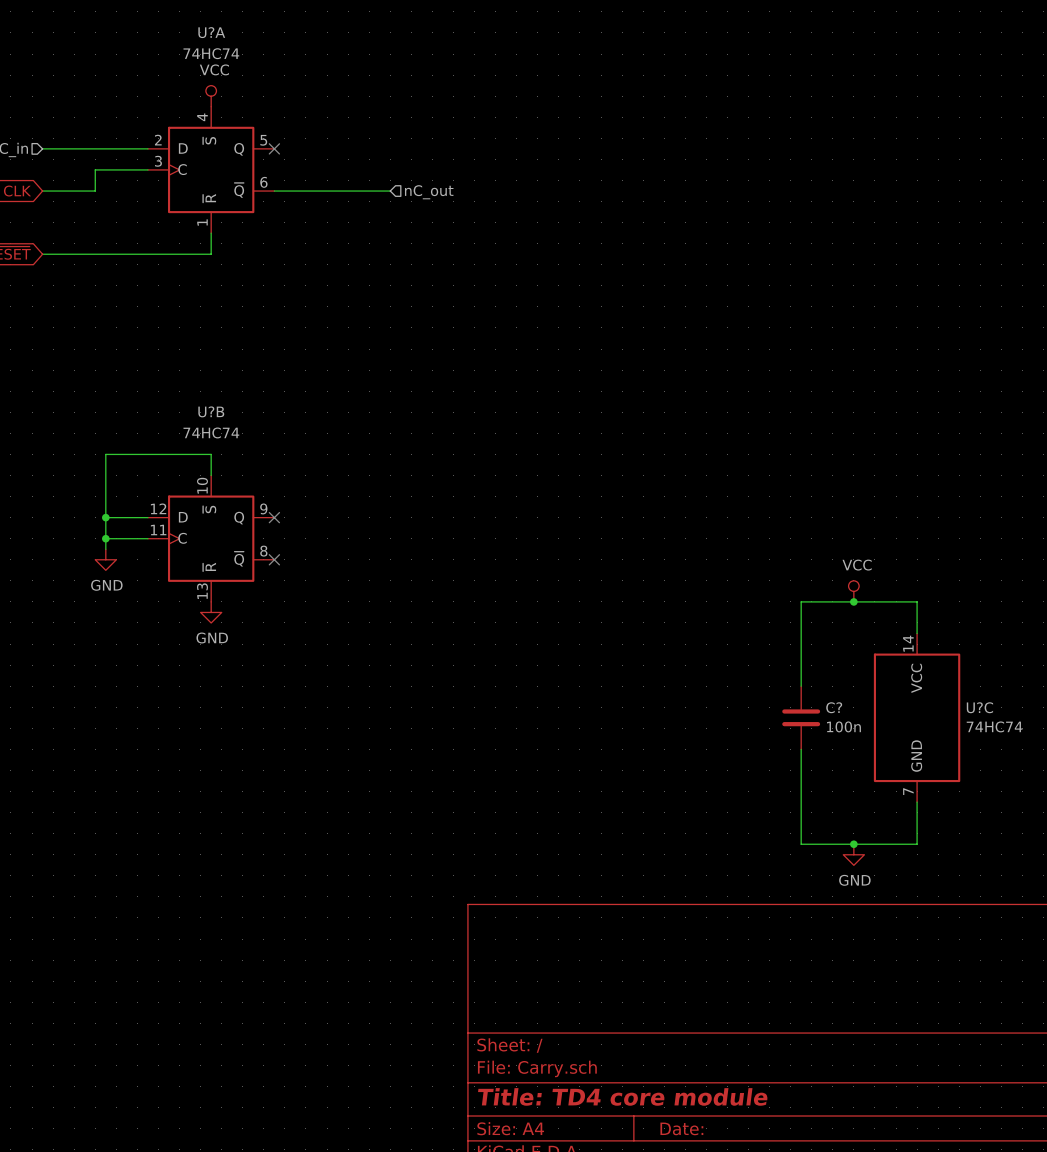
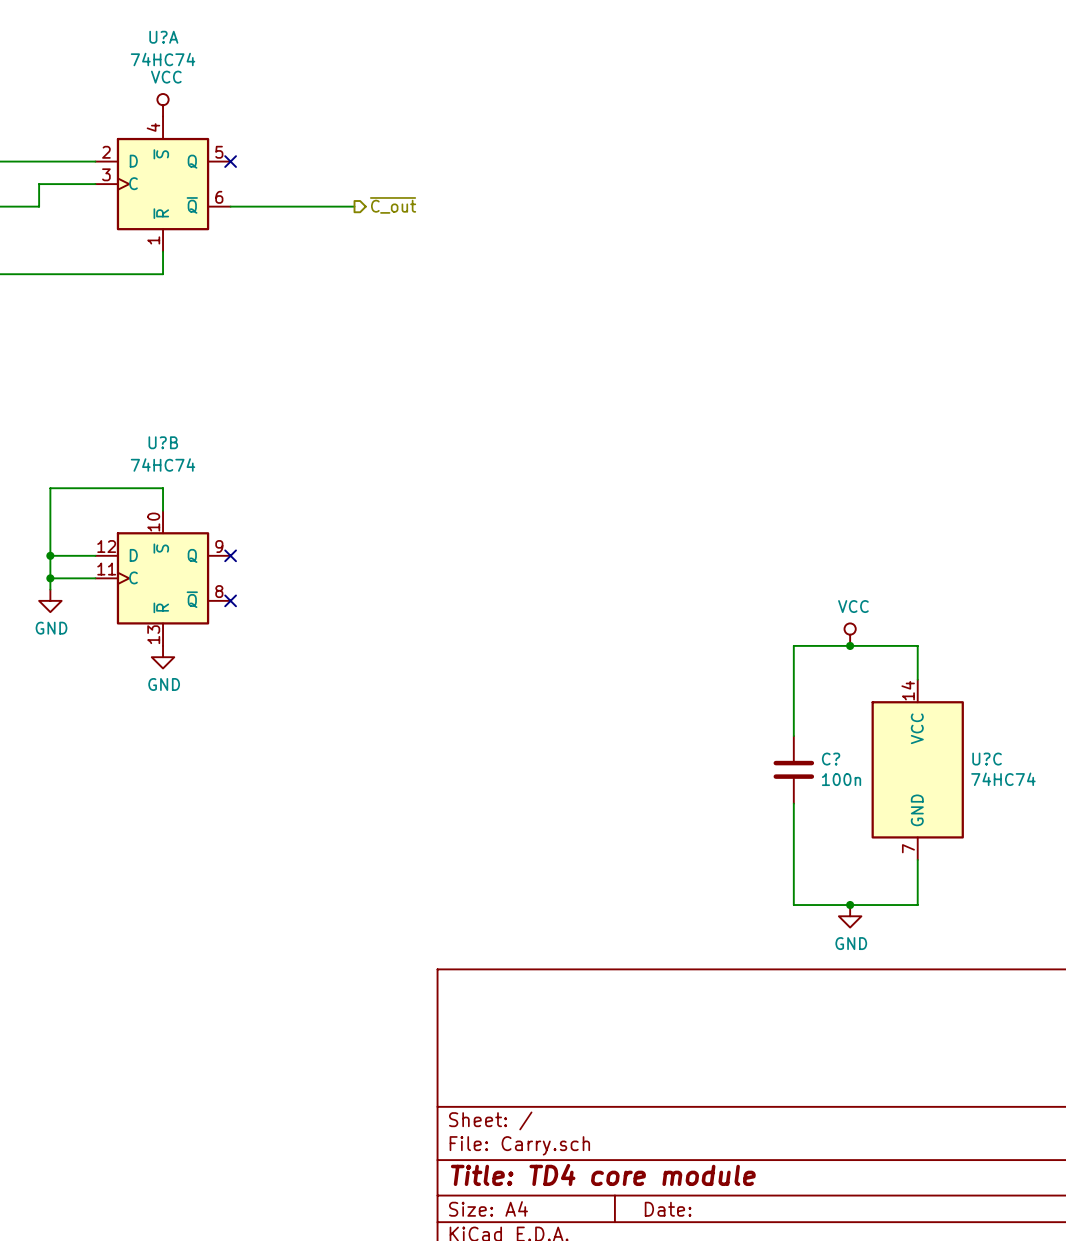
hierarchical label shape: input (429, 192) -> output (393, 205)
hierarchical label: nC_out (429, 192) -> ~{C_out} (393, 205)

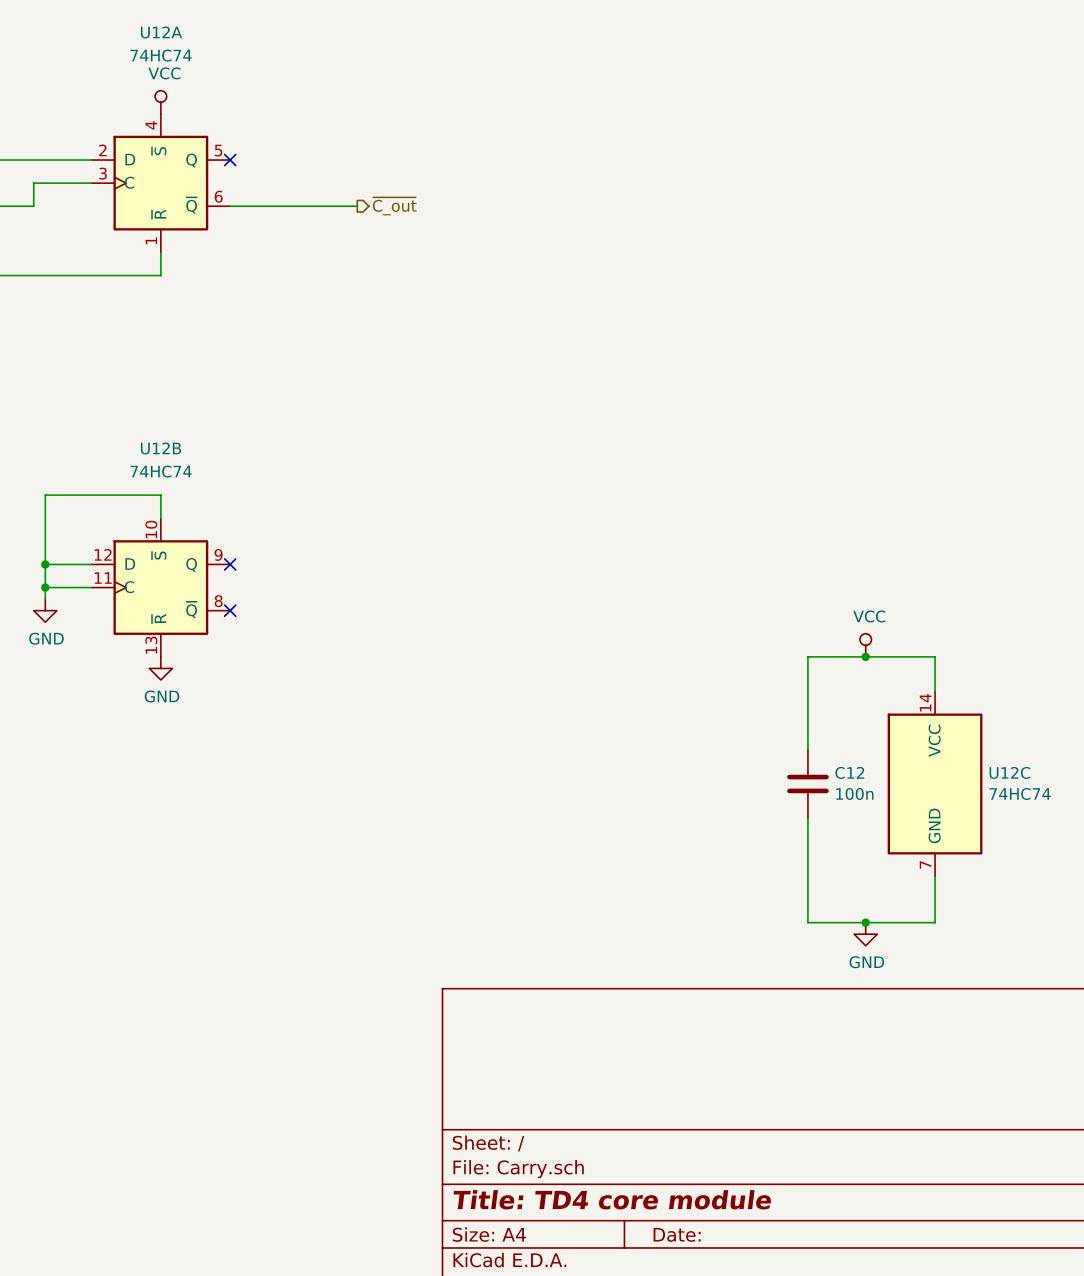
U?A name: U?A (163, 37) -> U12A (161, 32)
U?B name: U?B (163, 442) -> U12B (161, 448)
C? name: C? (831, 759) -> C12 (849, 772)
U?C name: U?C (987, 759) -> U12C (1009, 772)

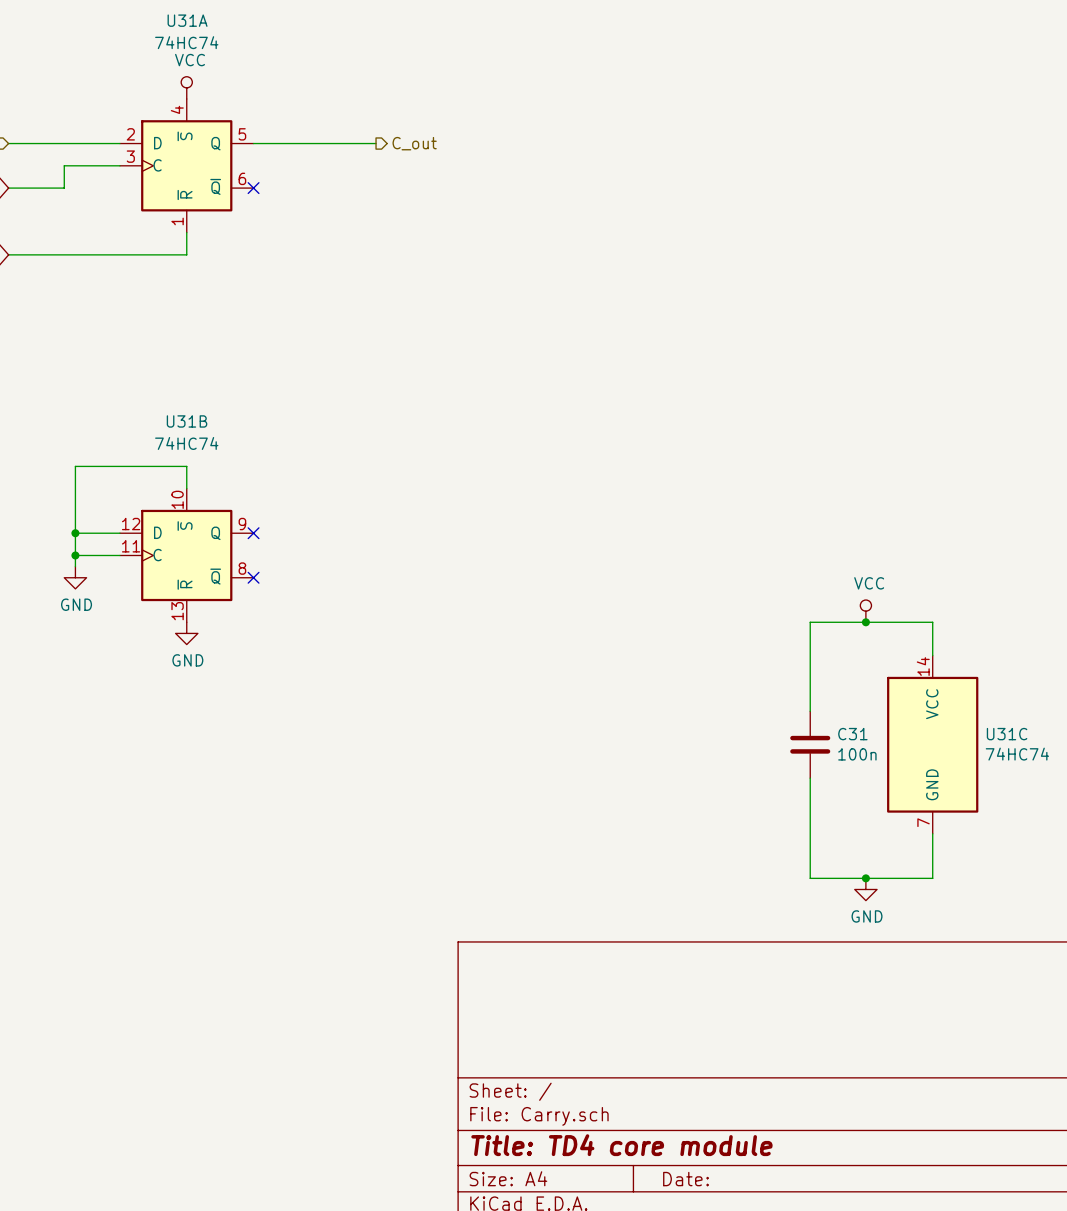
U12A name: U12A (161, 32) -> U31A (187, 20)
no-connect mark position: (230, 160) -> (253, 188)
hierarchical label: none -> C_out (414, 143)
wire: (230, 206) (357, 206) -> (253, 143) (376, 143)
hierarchical label: ~{C_out} (394, 206) -> none
U12B name: U12B (161, 448) -> U31B (187, 421)
C12 name: C12 (849, 772) -> C31 (852, 734)
U12C name: U12C (1009, 772) -> U31C (1007, 734)

